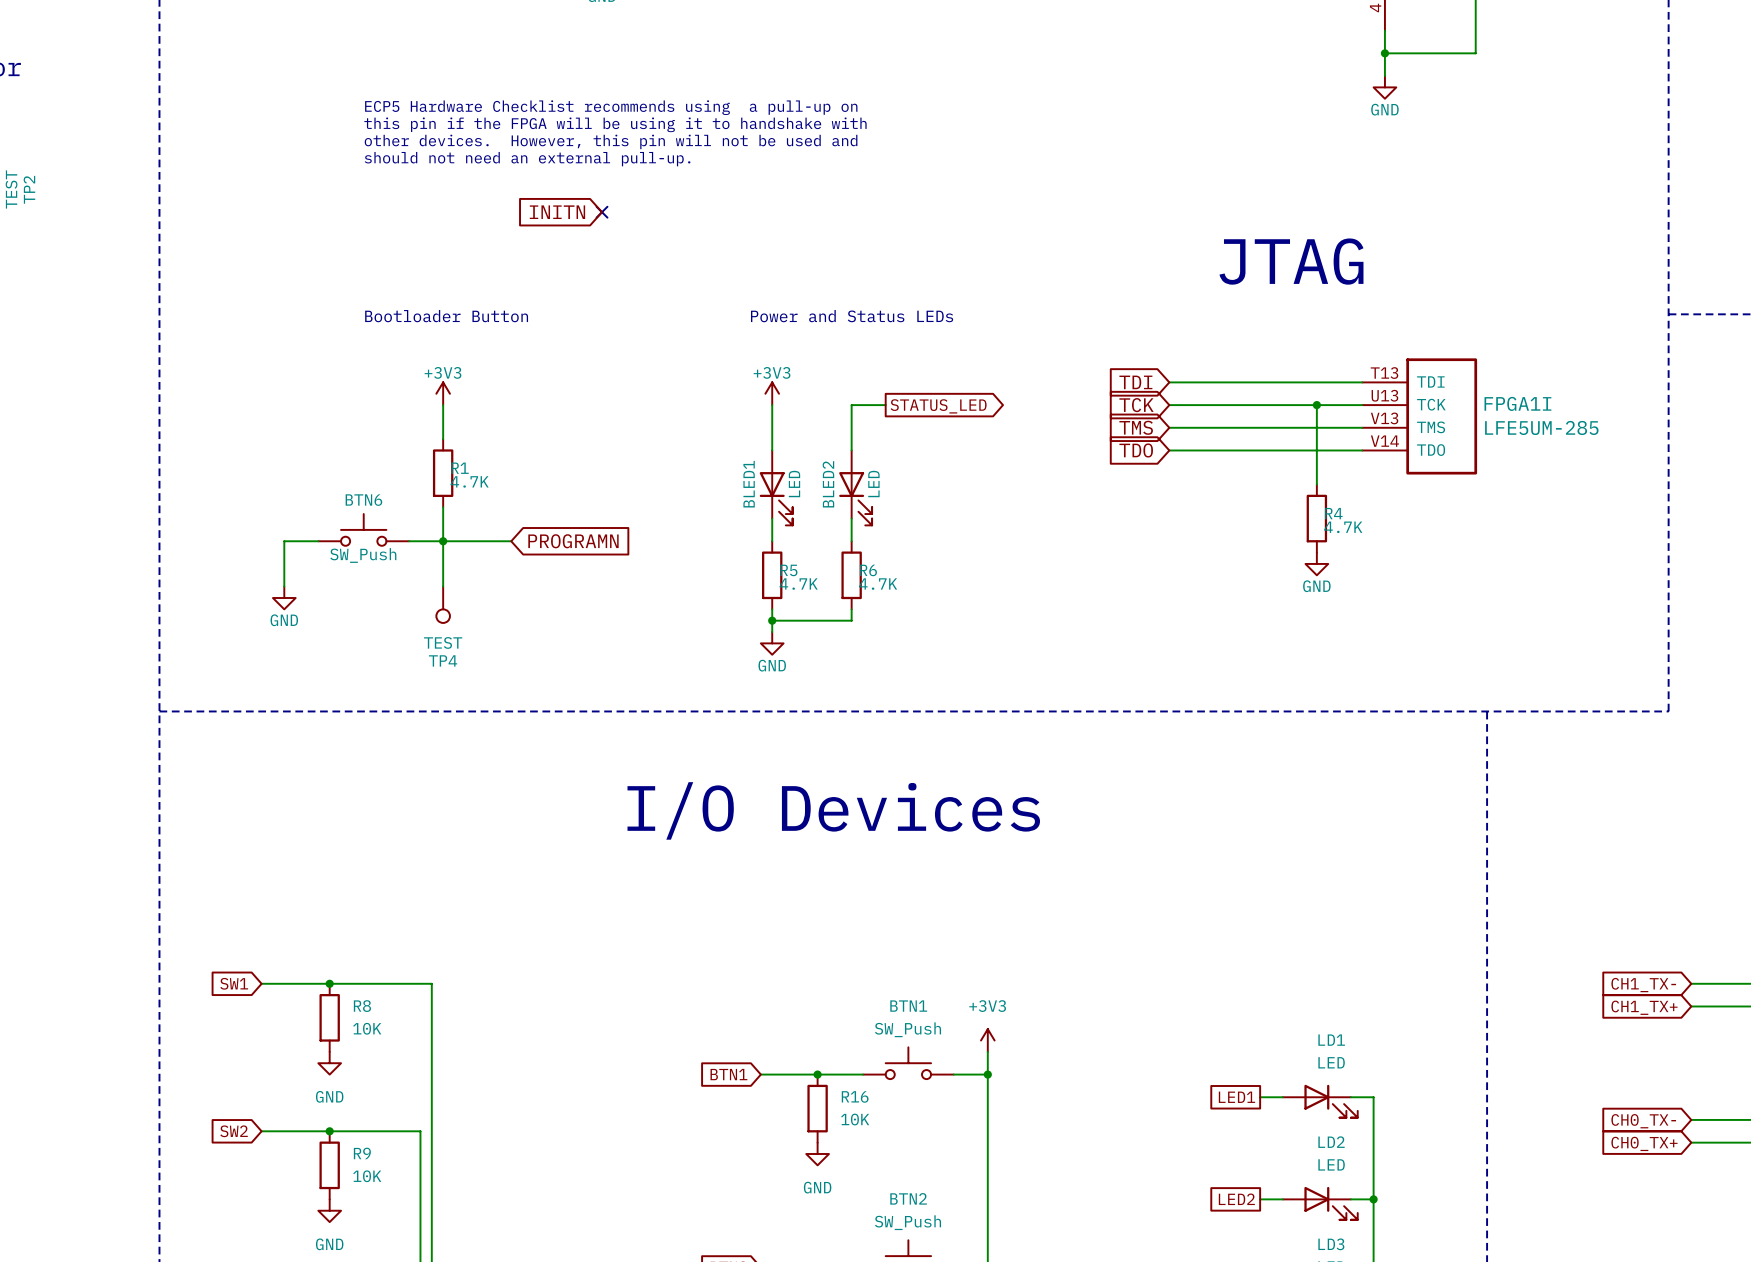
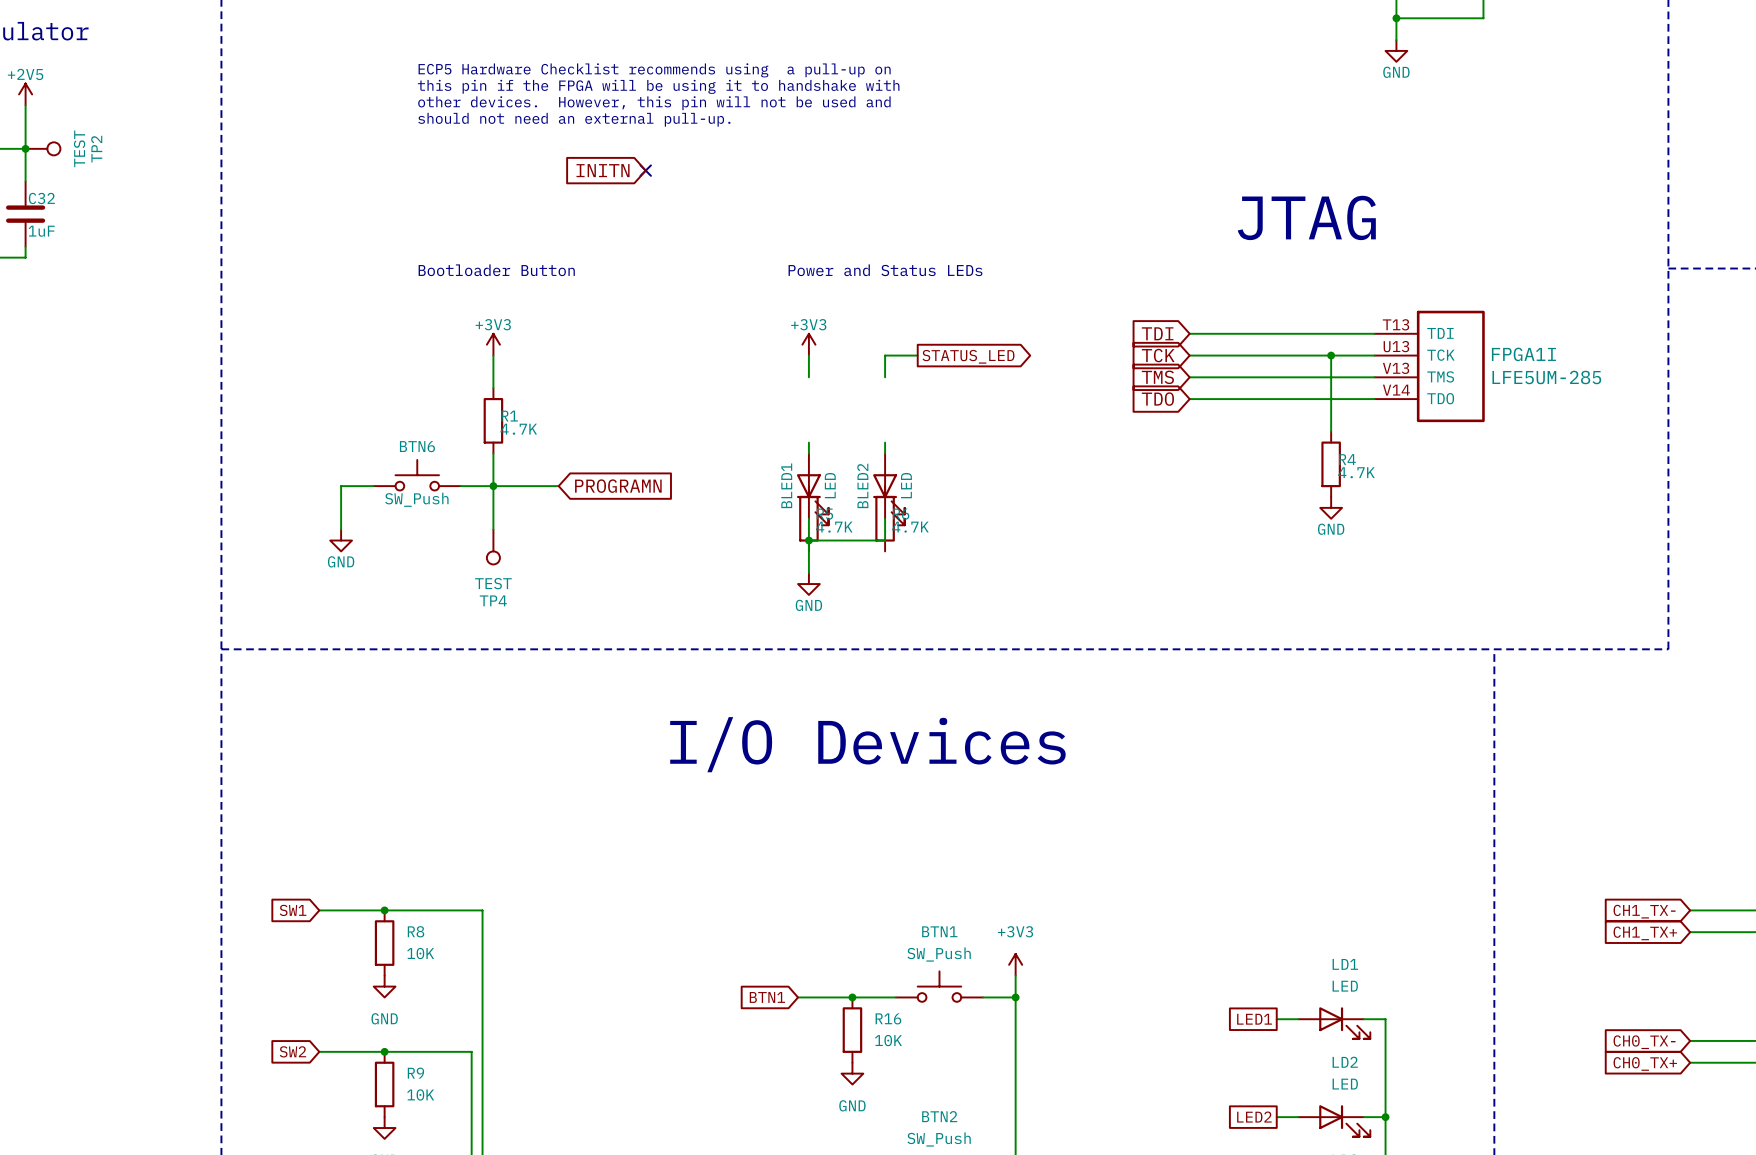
wire: (772, 427) (772, 450) -> none
wire: (851, 427) (851, 450) -> none
BLED1 position: (776, 487) -> (812, 489)
BLED2 position: (855, 487) -> (888, 489)
wire: none -> (808, 518) (808, 551)
wire: none -> (885, 518) (885, 540) (808, 540)
wire: (851, 609) (851, 620) (772, 620) -> none
junction position: (772, 620) -> (808, 540)

